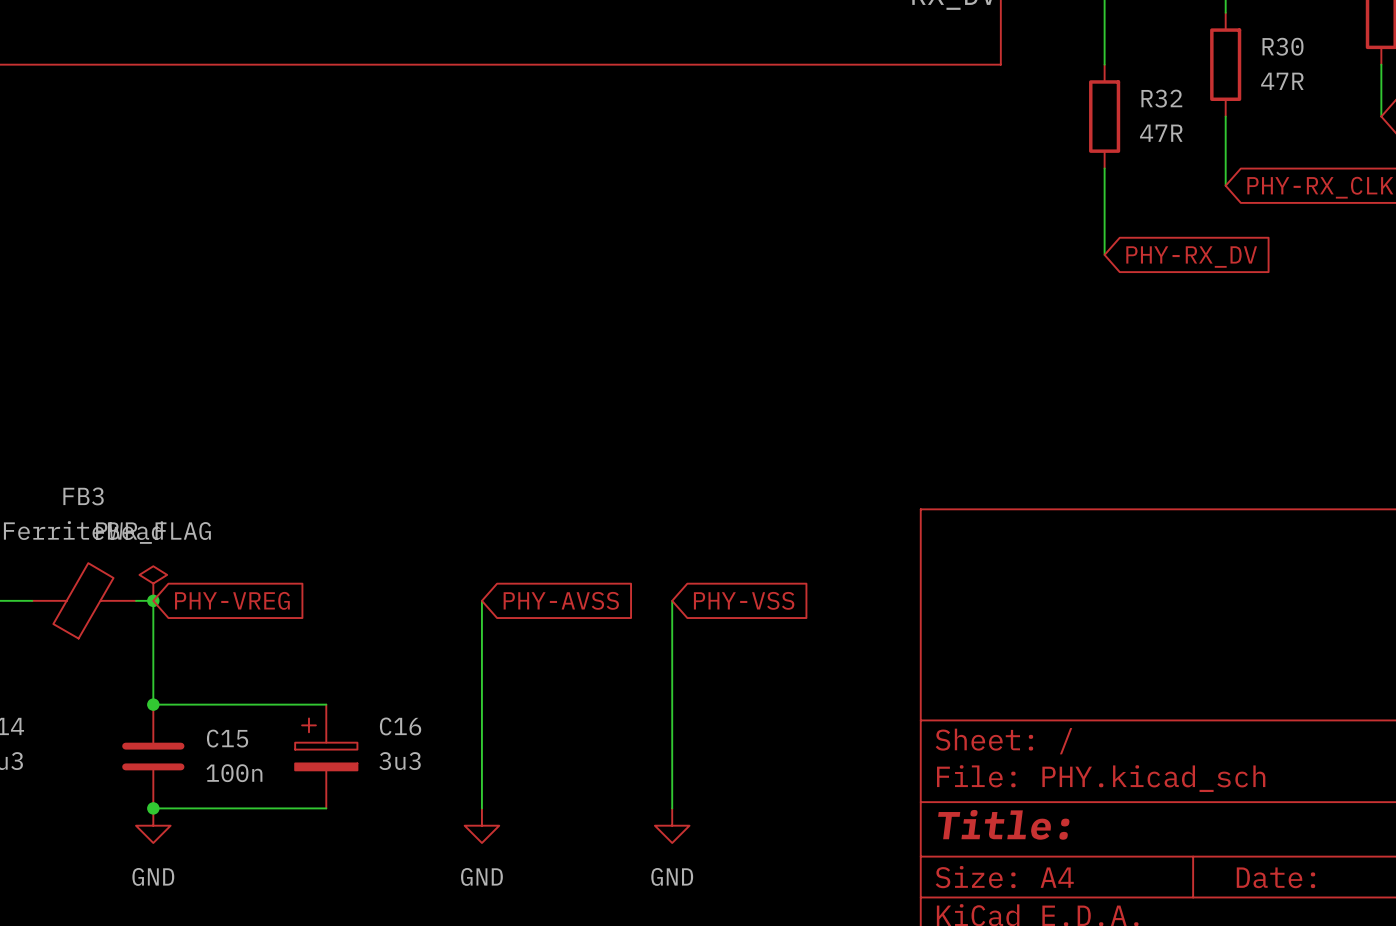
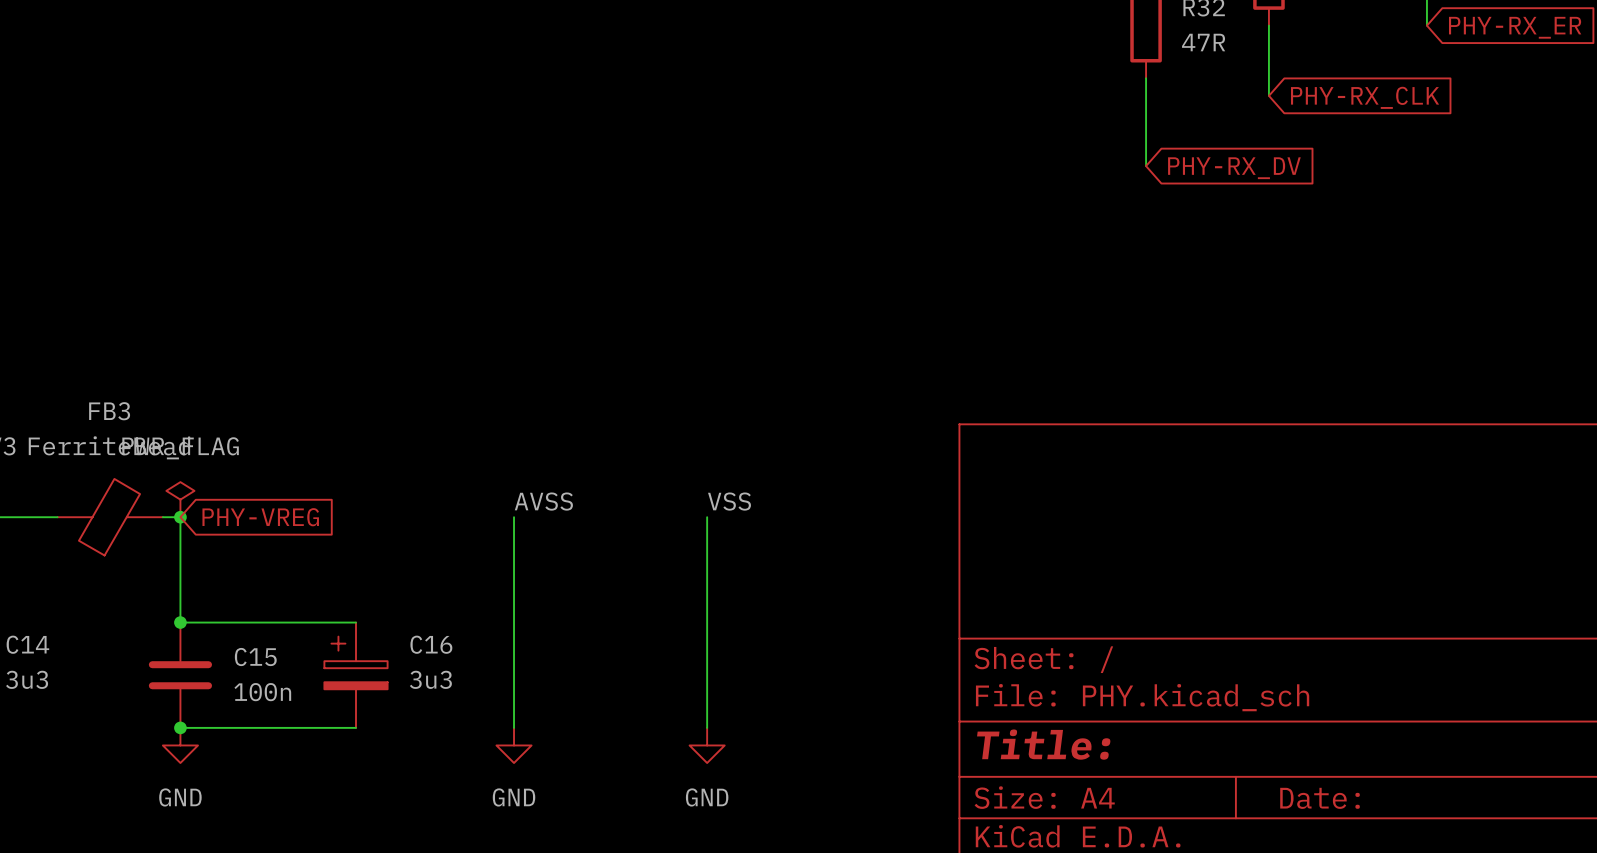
label: none -> AVSS (543, 501)
label: none -> VSS (729, 501)
global label: PHY-AVSS (561, 600) -> none
global label: PHY-VSS (744, 600) -> none

